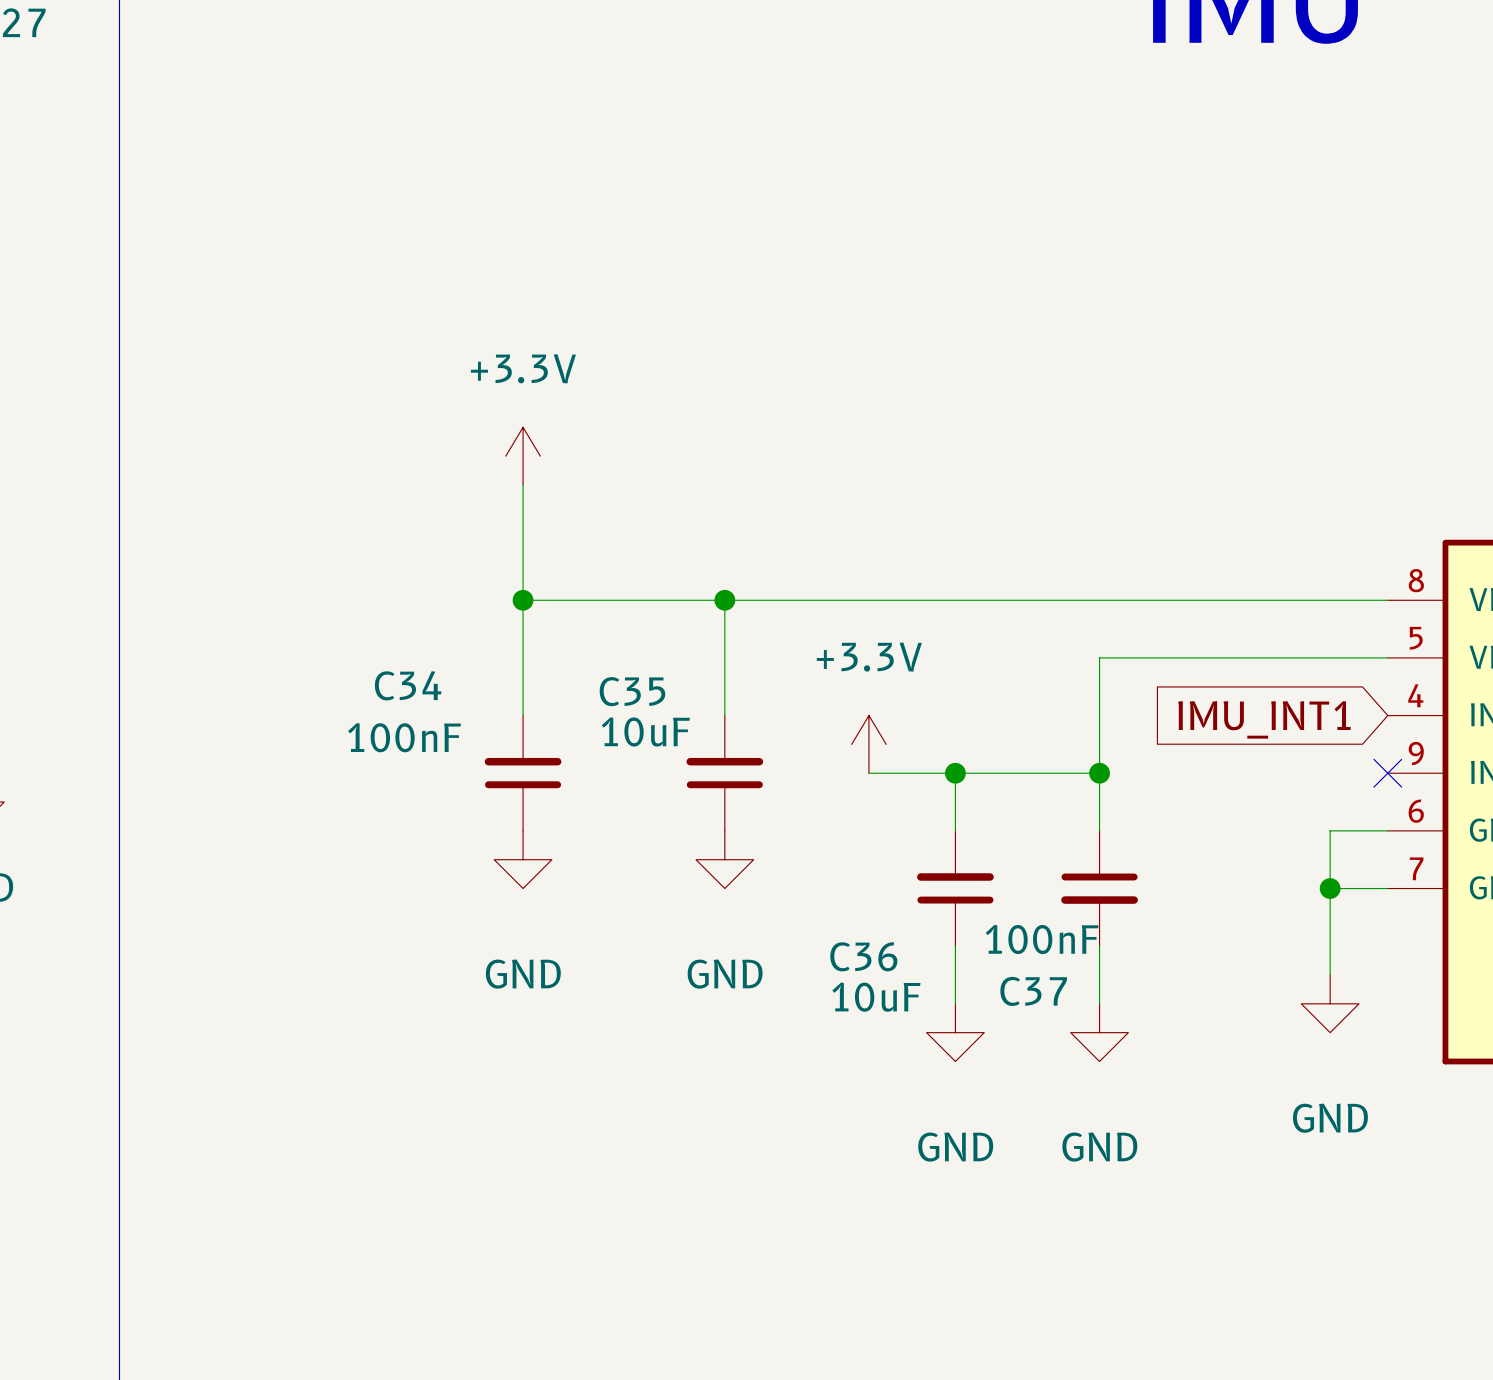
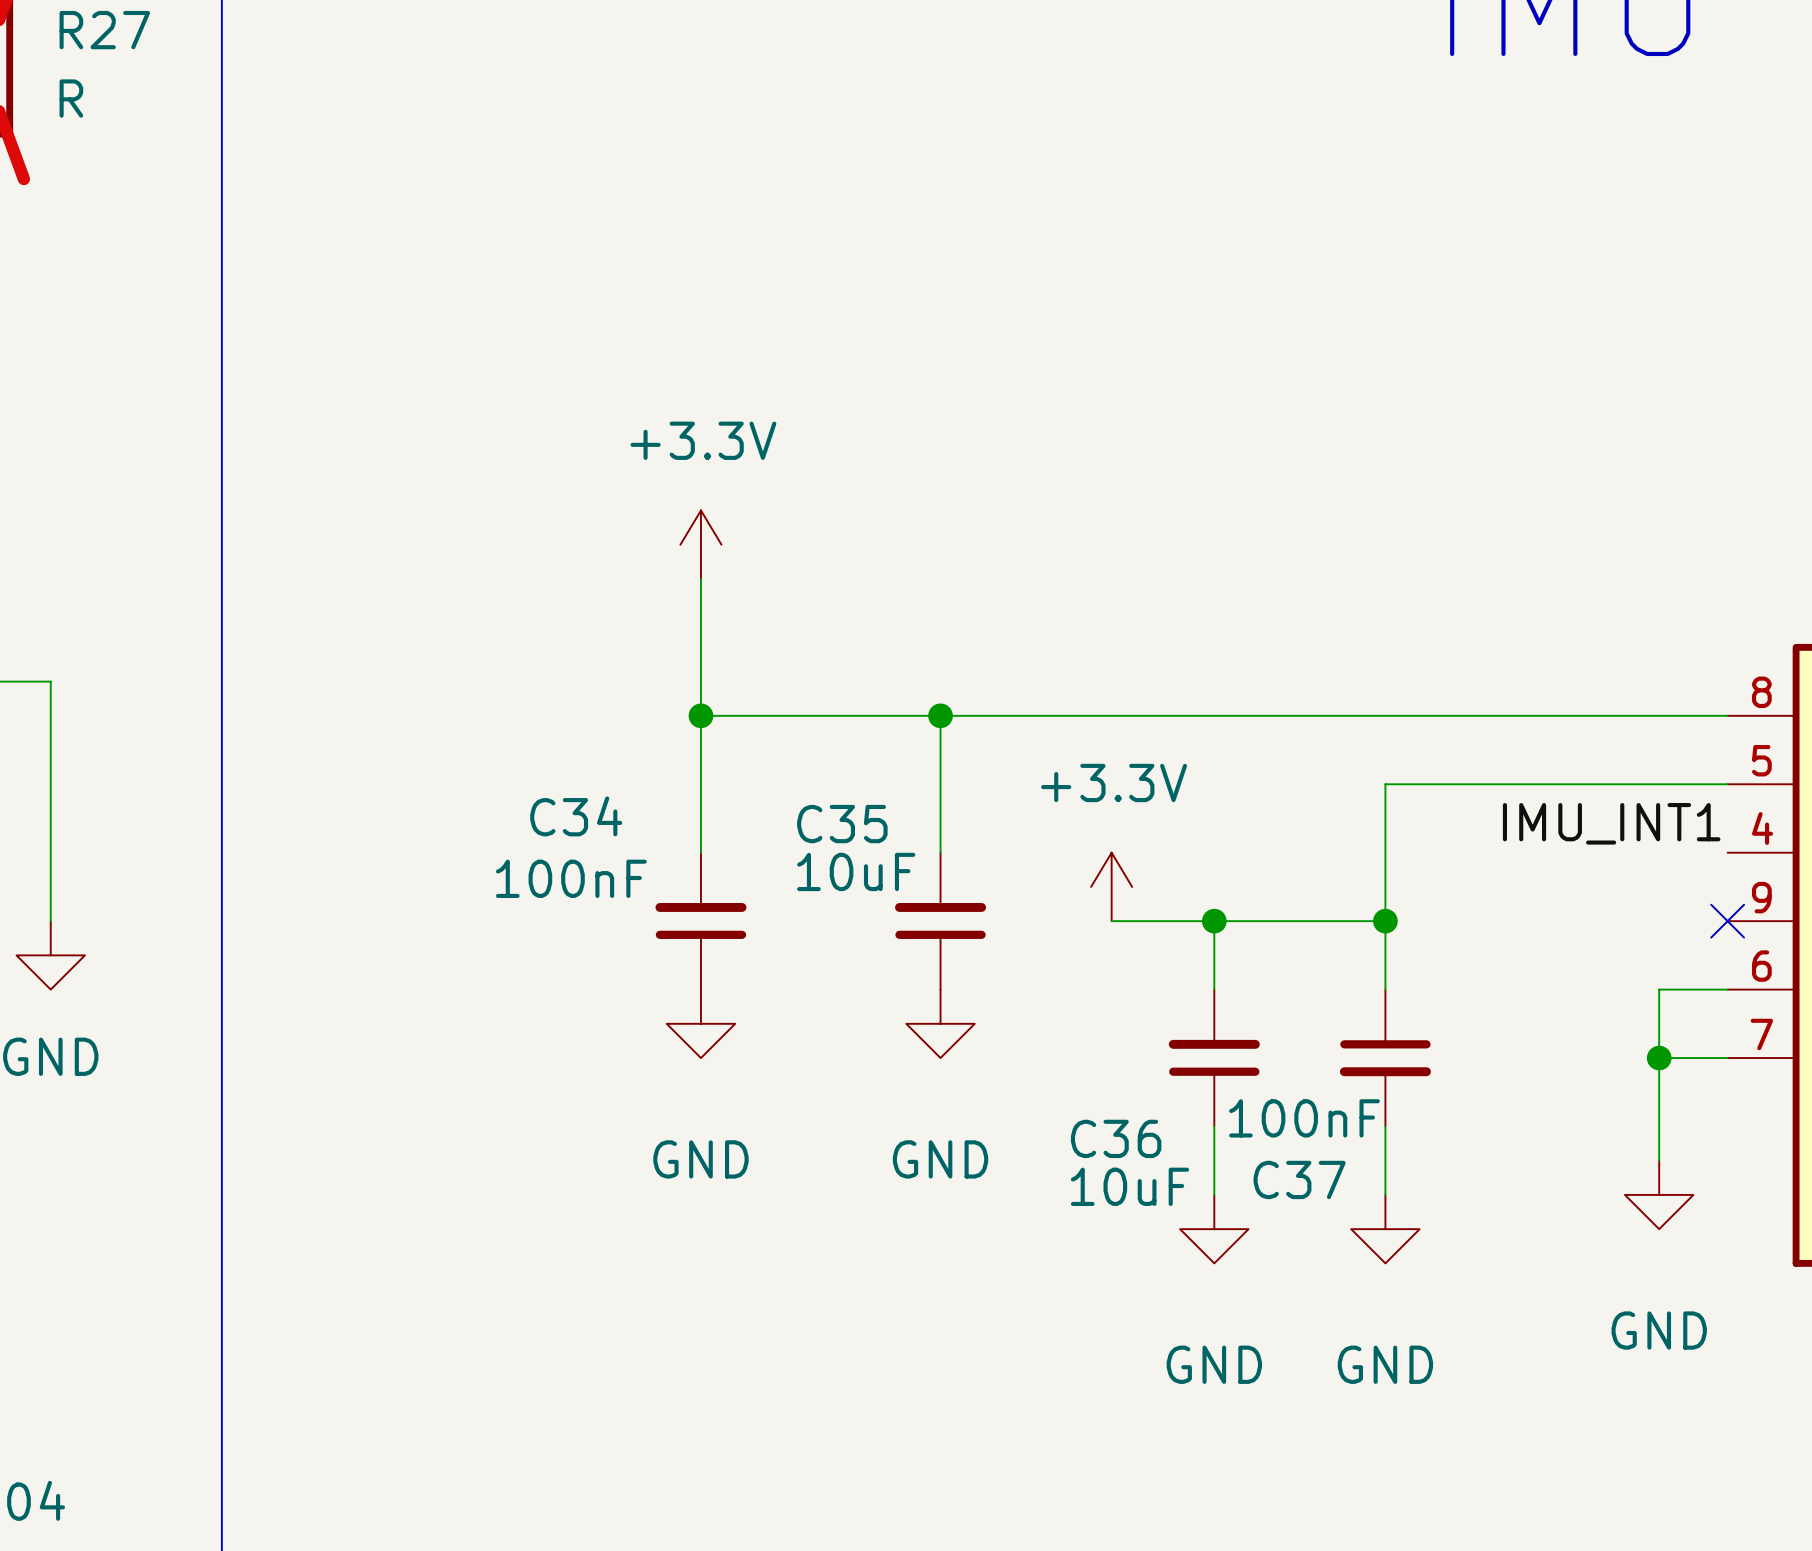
label: none -> IMU_INT1 (1611, 823)
global label: IMU_INT1 (1264, 719) -> none

